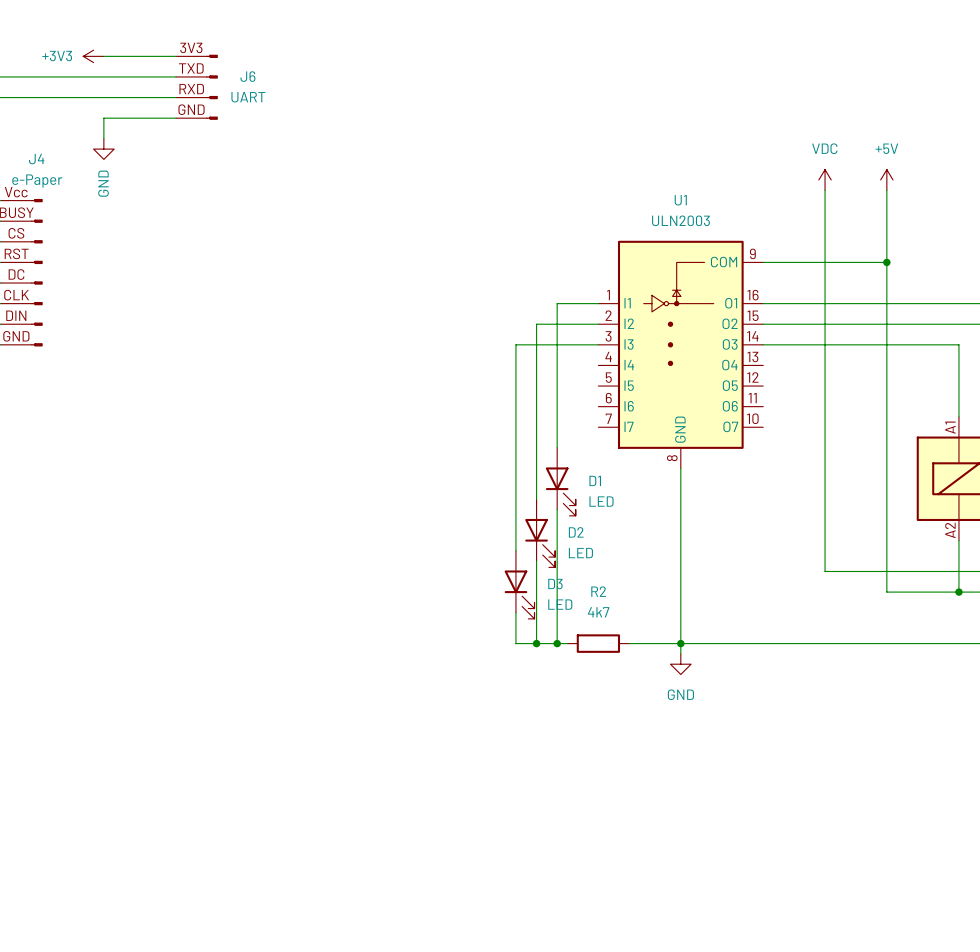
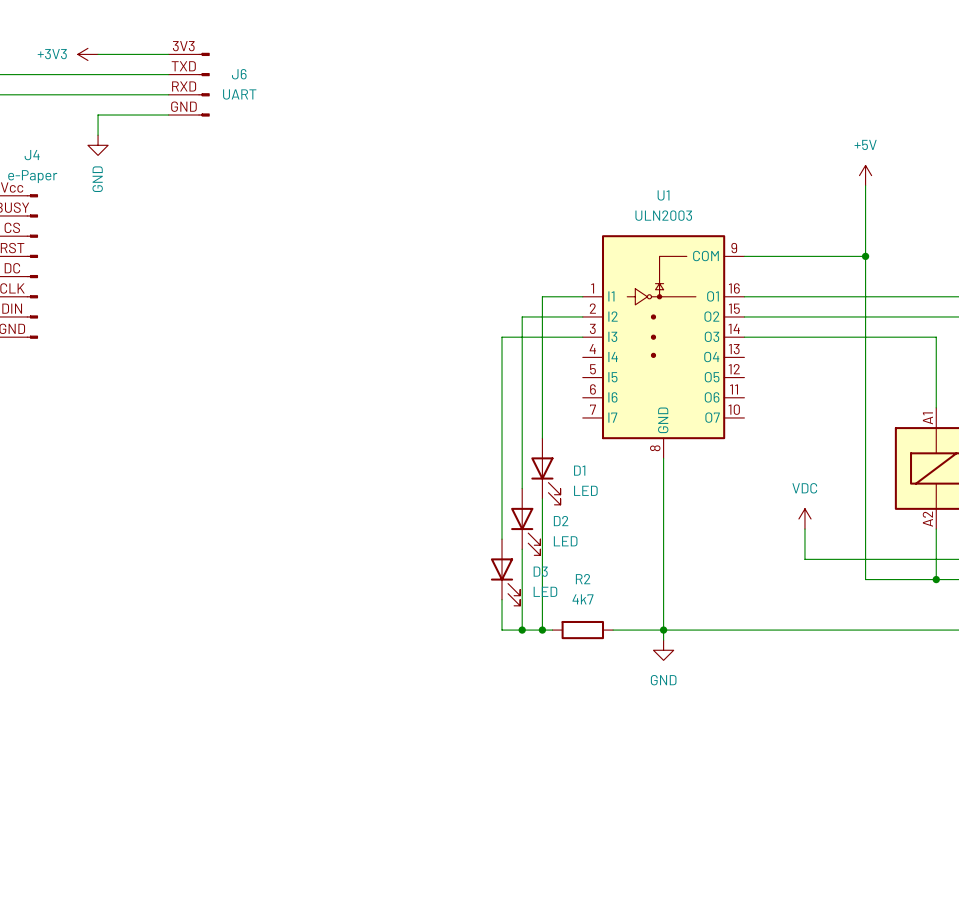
power symbol: VDC (825, 179) -> none
wire: (825, 190) (825, 540) -> none
power symbol: none -> VDC (804, 518)

